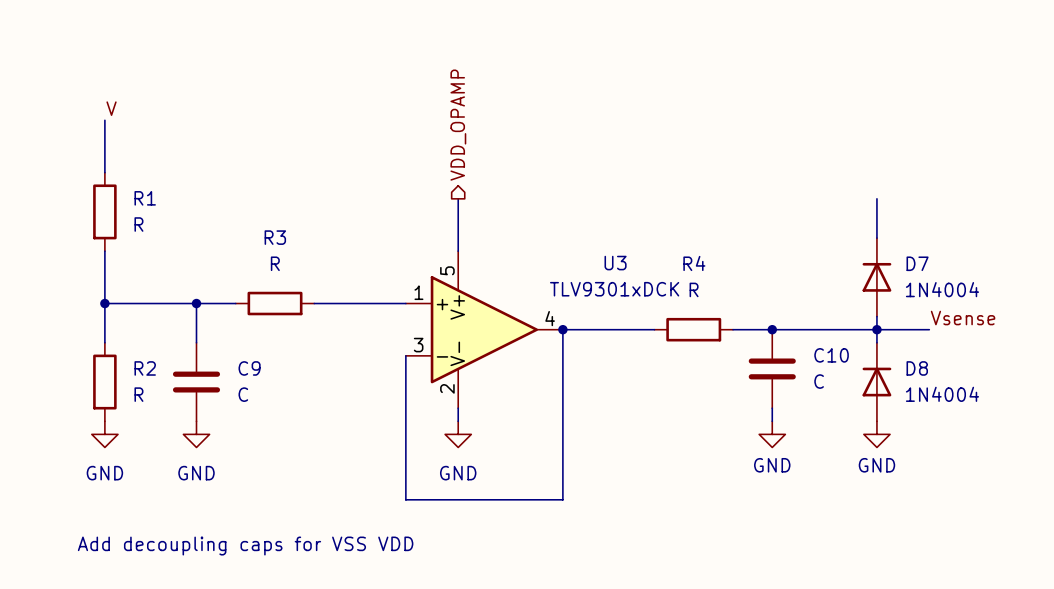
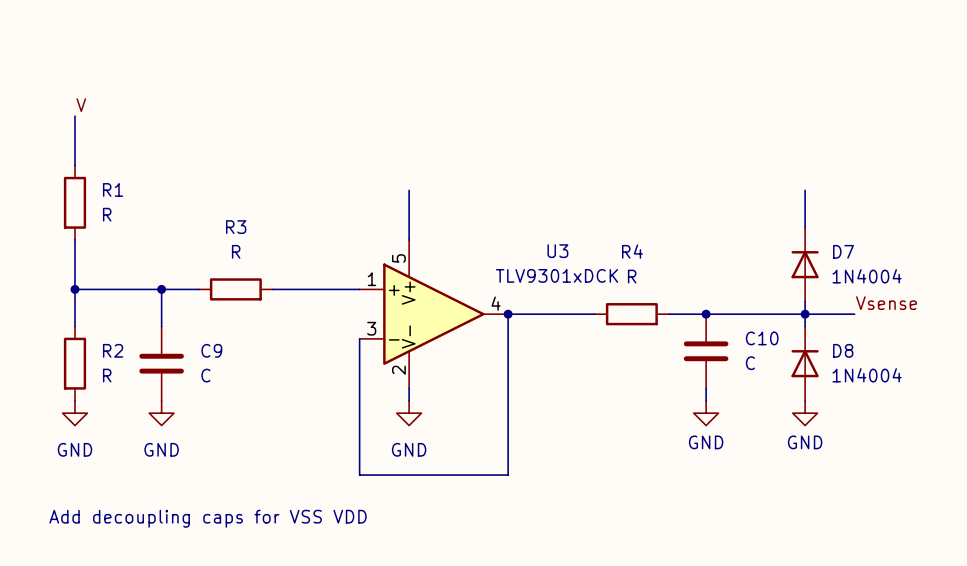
hierarchical label: VDD_OPAMP (458, 125) -> none

